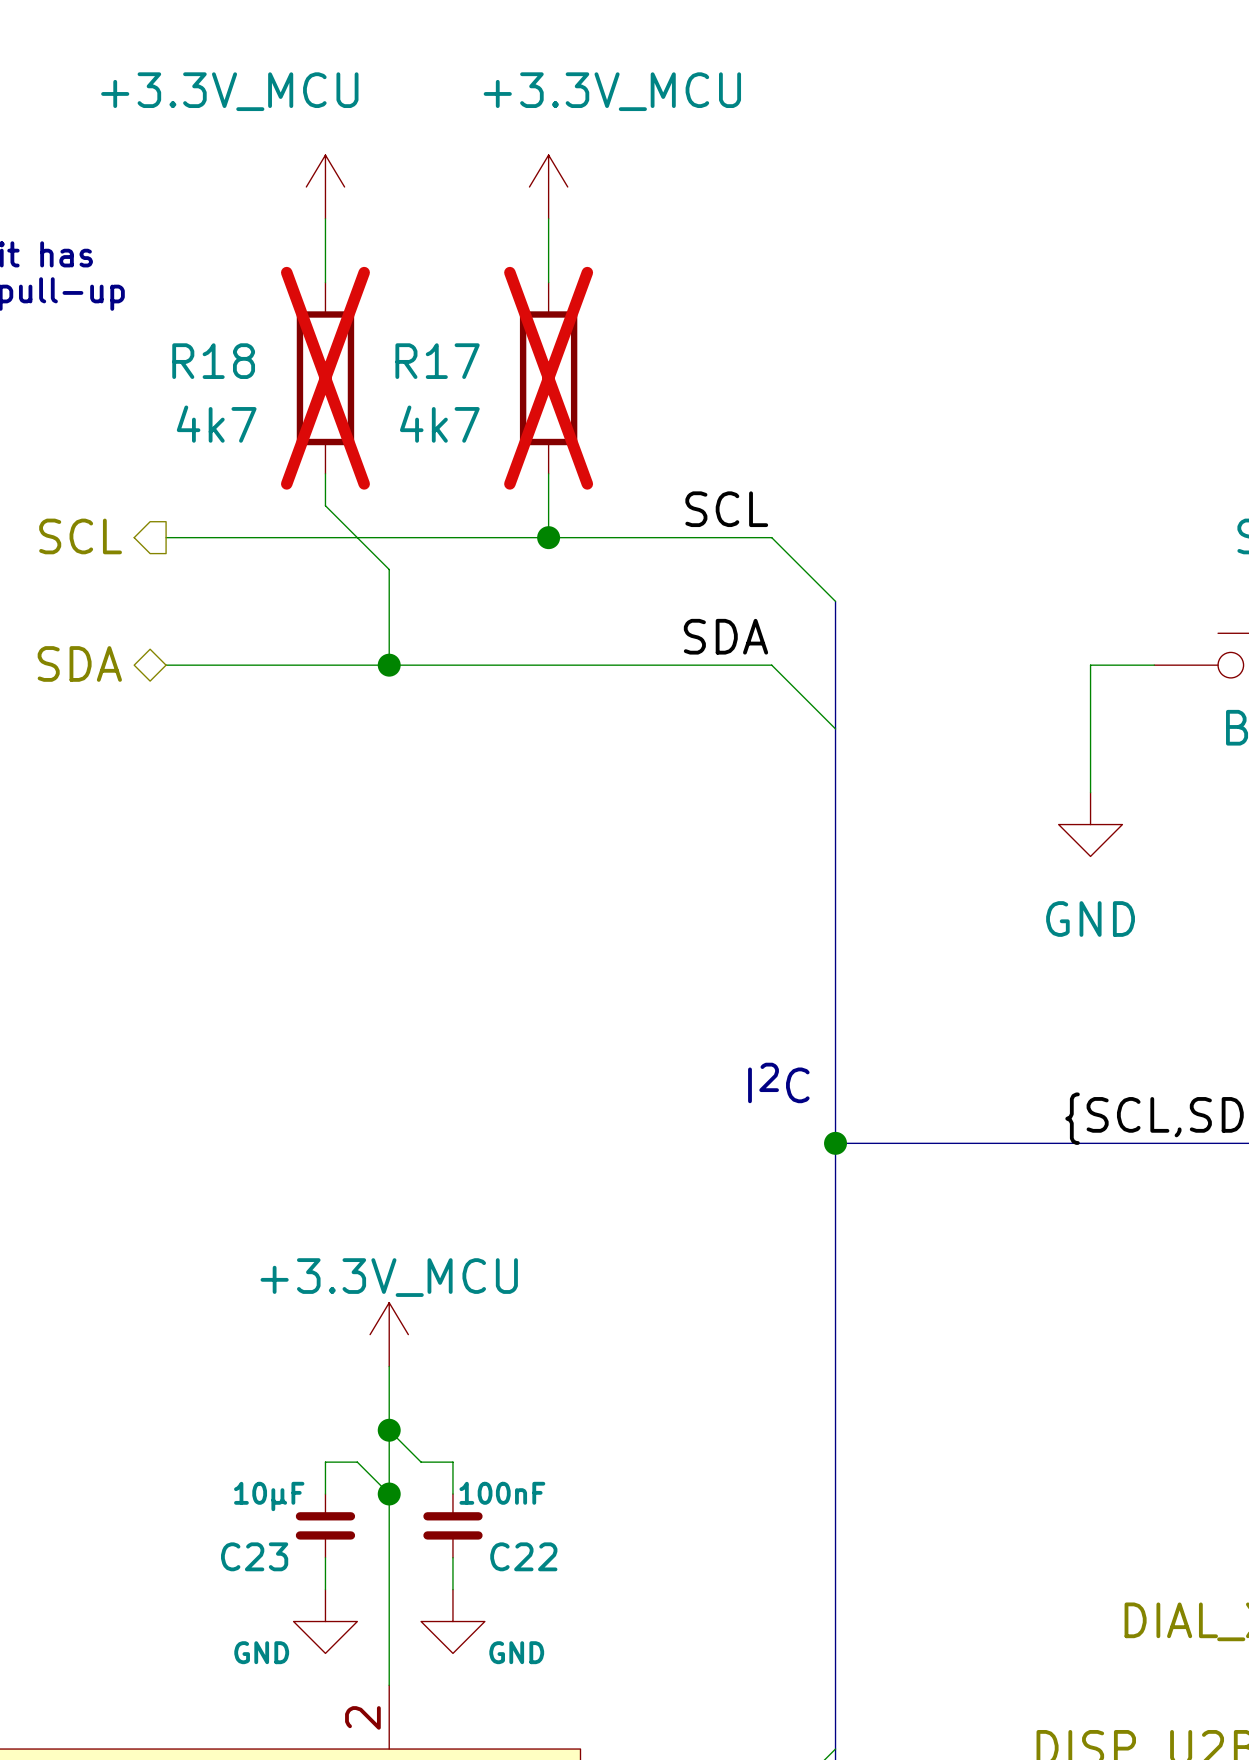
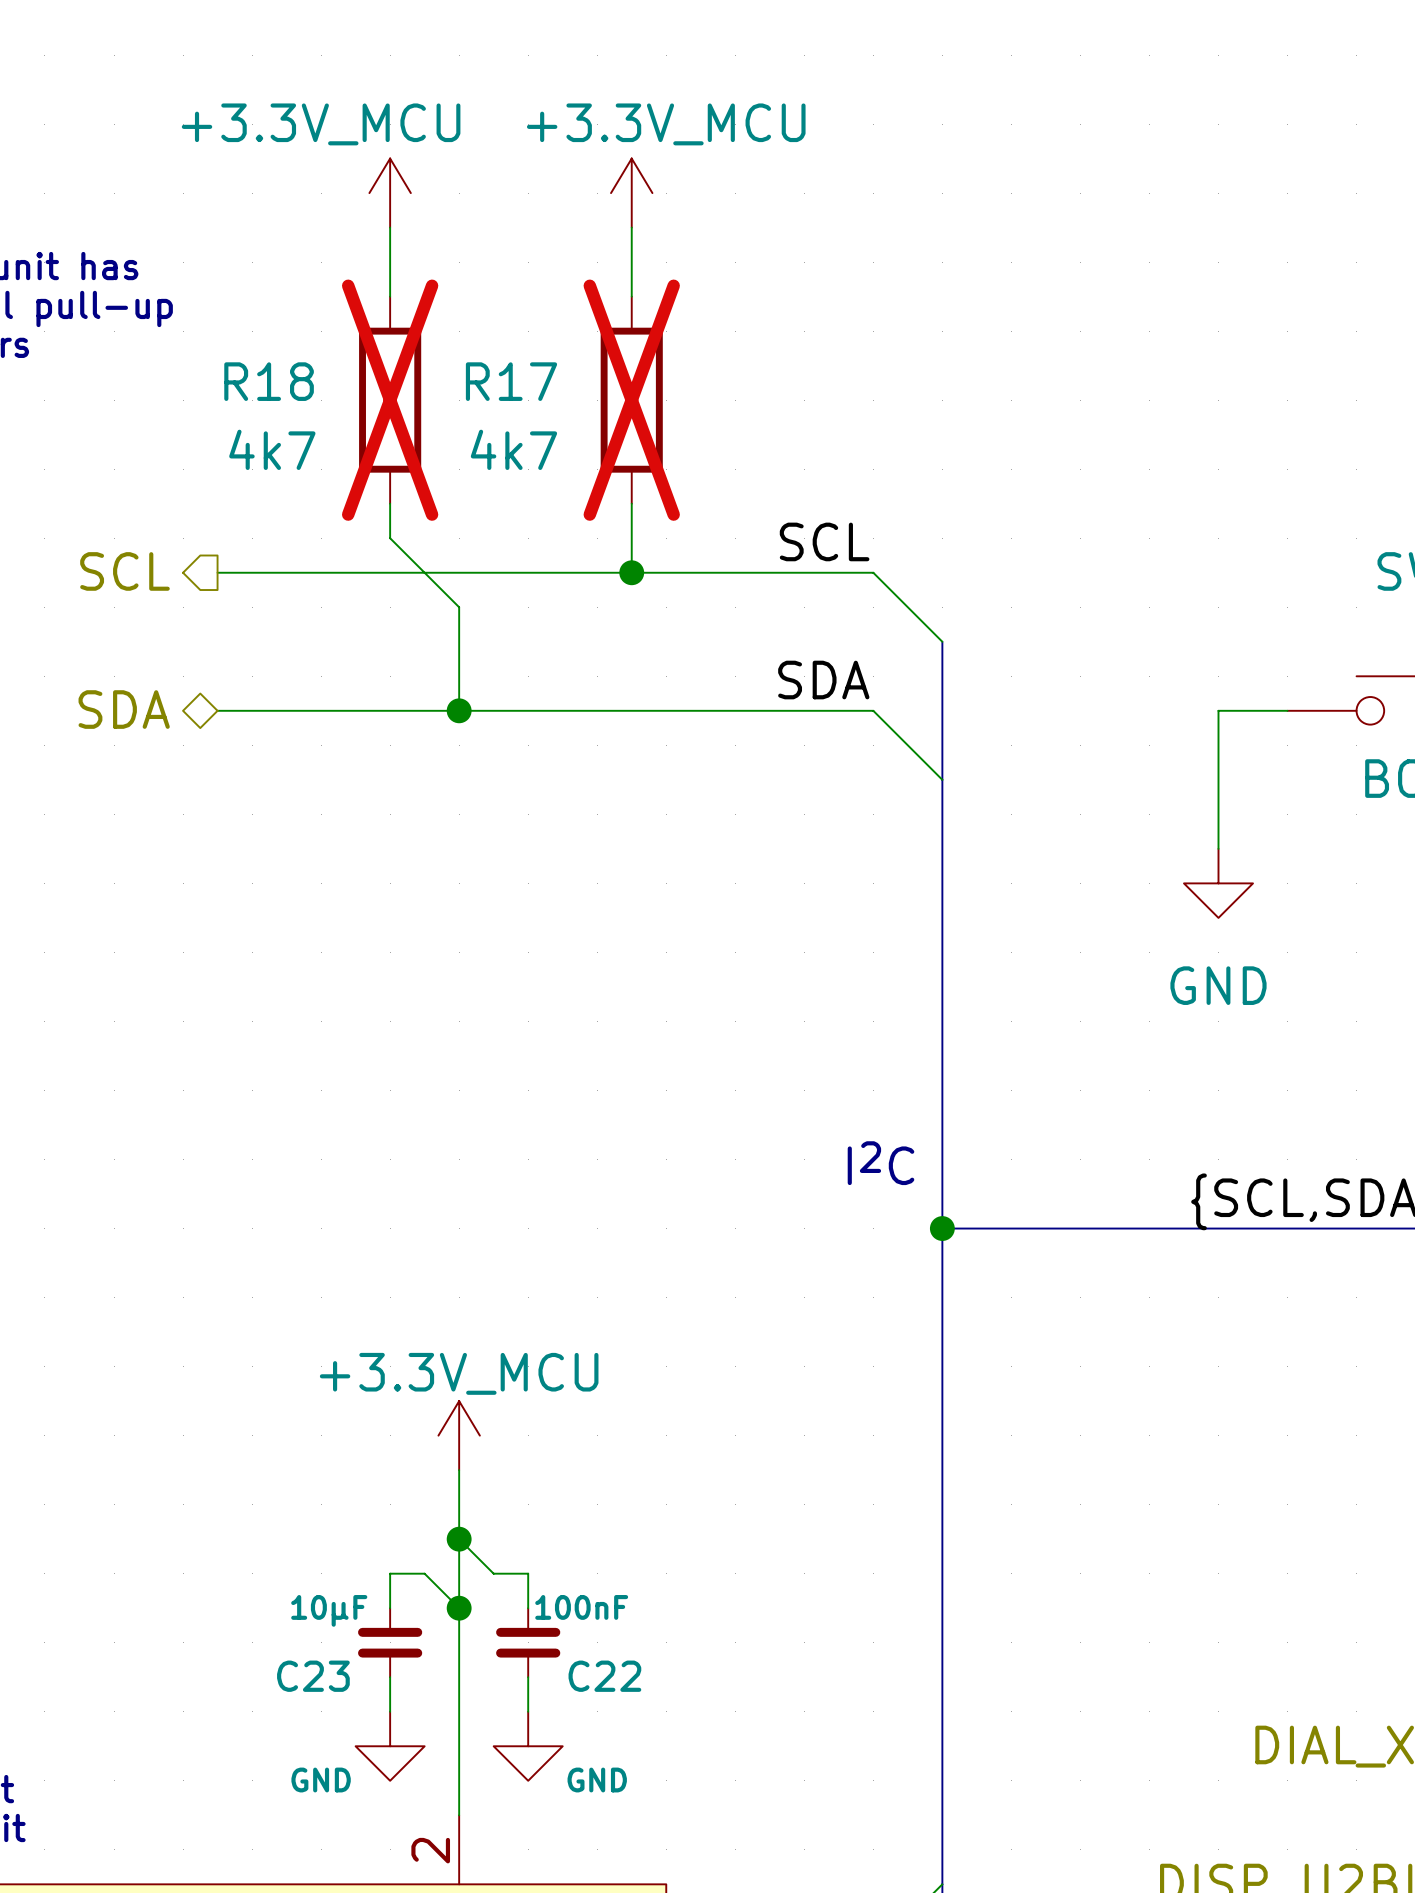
power symbol text position: +3.3V_MCU (229, 91) -> +3.3V_MCU (321, 124)
power symbol text position: +3.3V_MCU (612, 91) -> +3.3V_MCU (666, 124)

